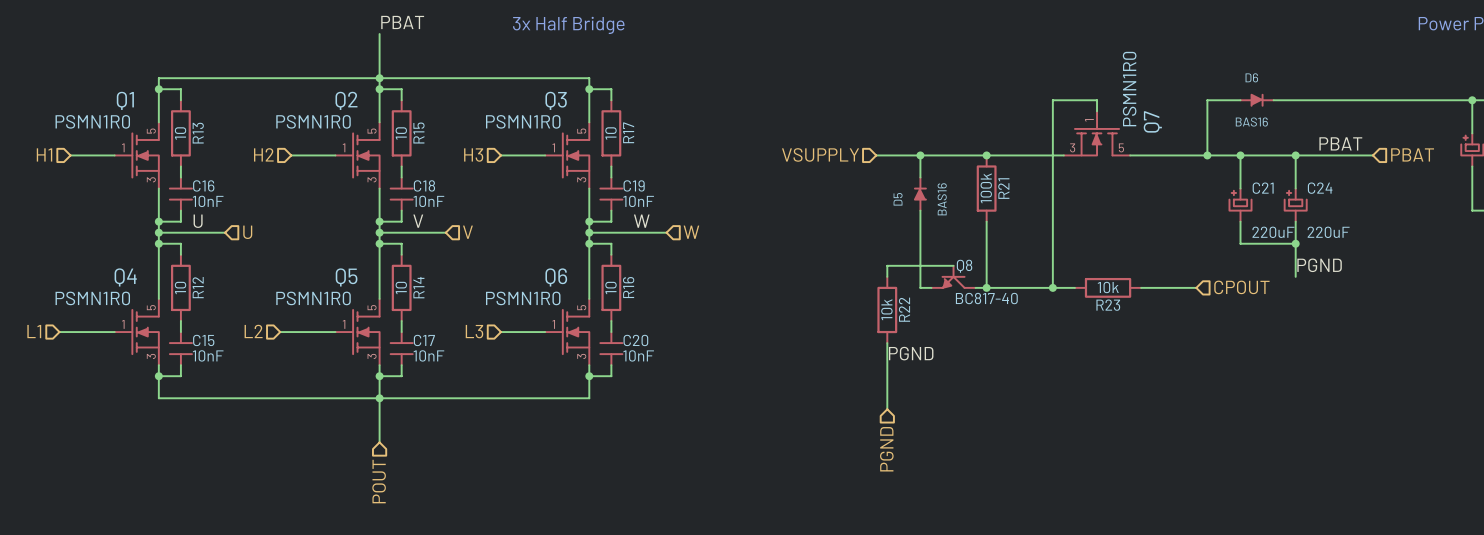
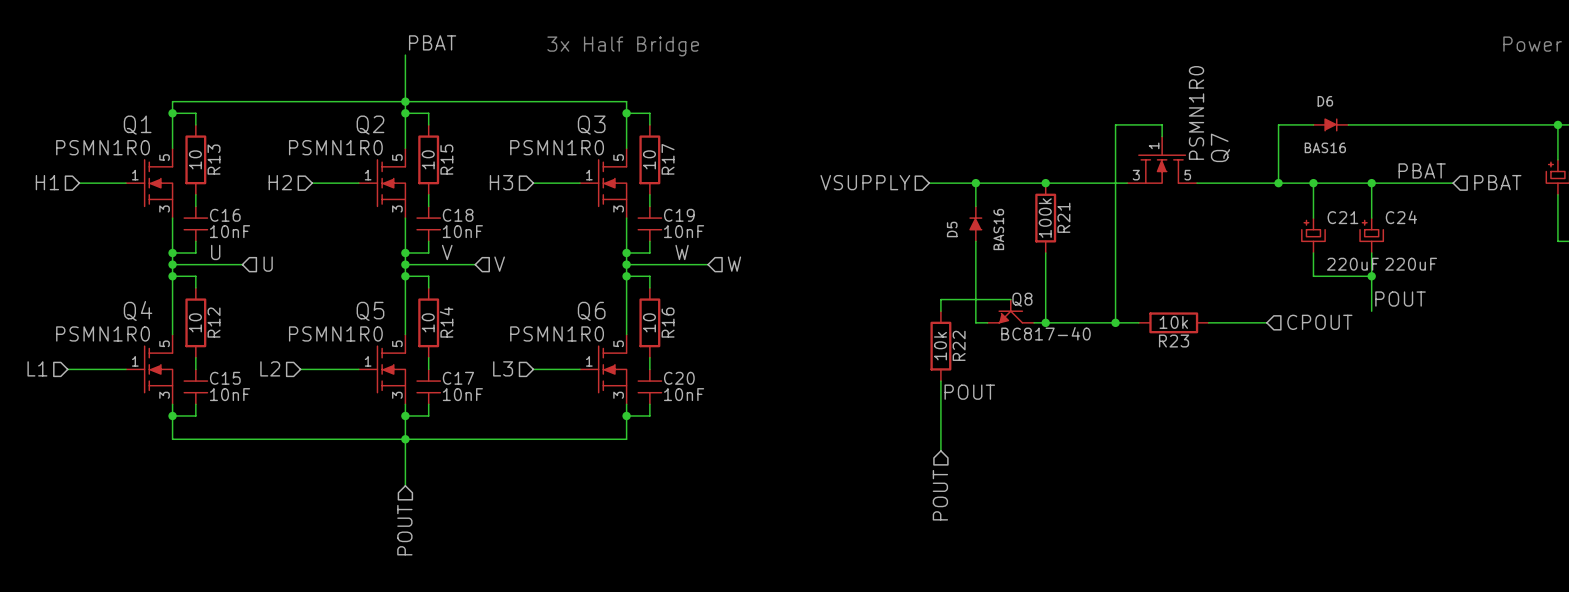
label: PGND (1319, 265) -> POUT (1400, 299)
label: PGND (911, 353) -> POUT (969, 392)
hierarchical label: PGND (886, 449) -> POUT (940, 495)

